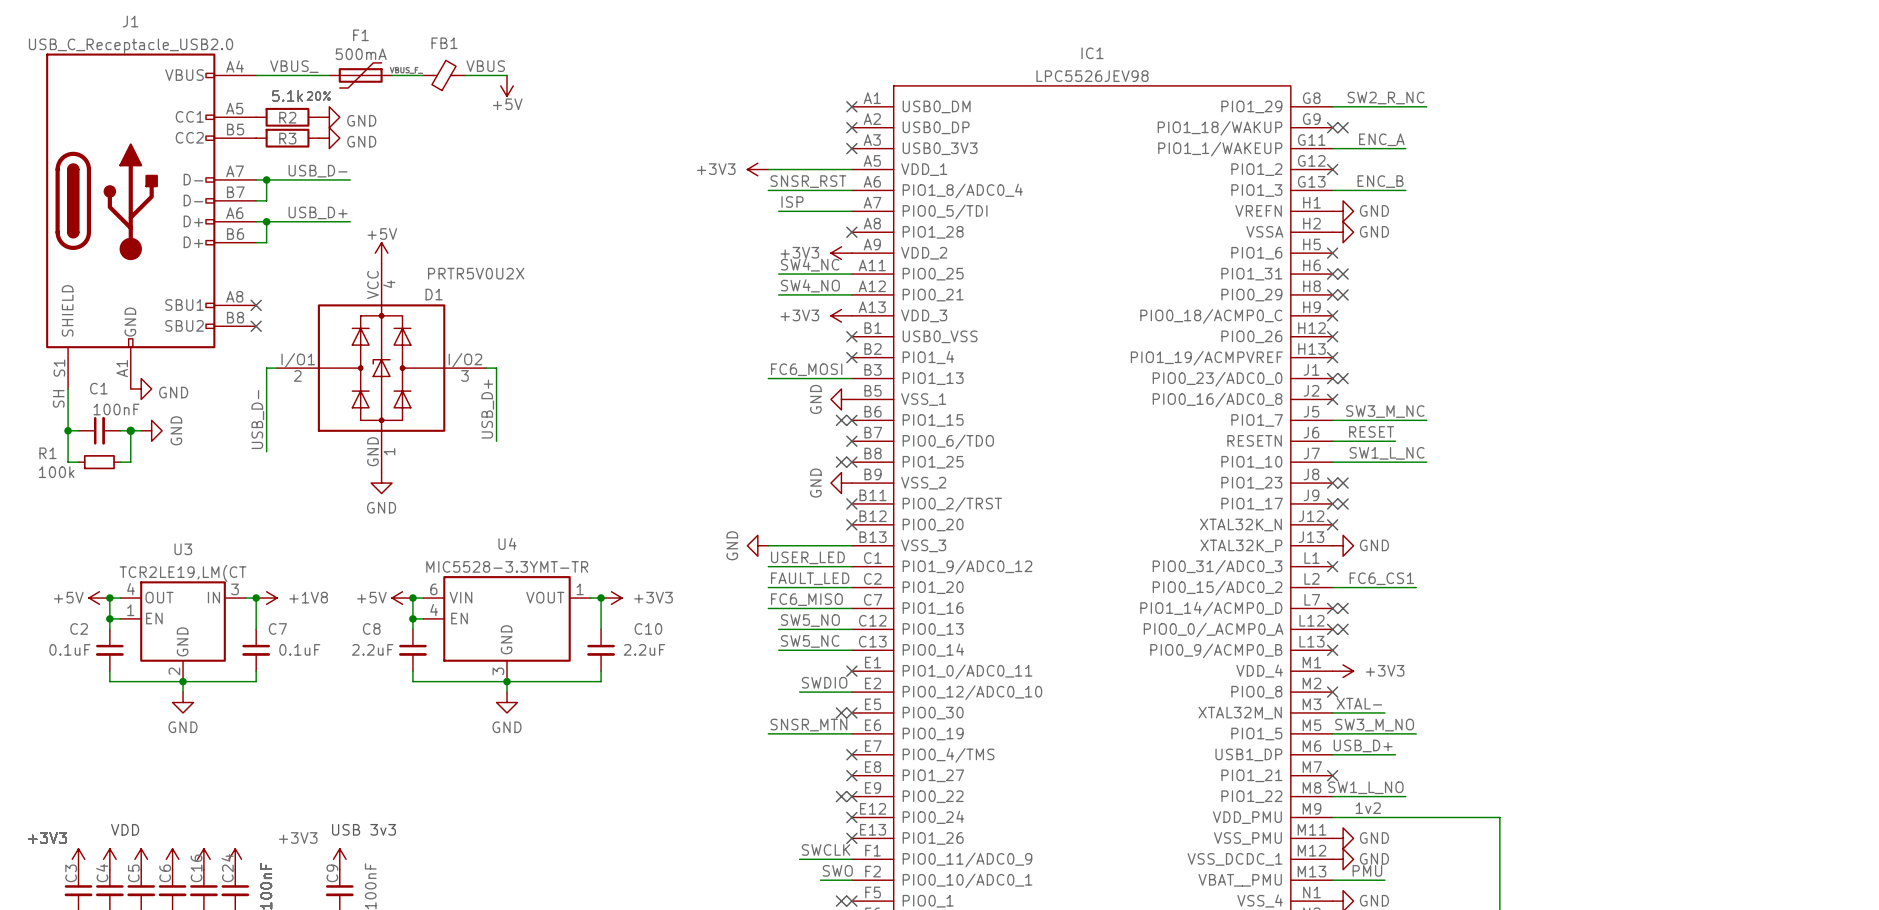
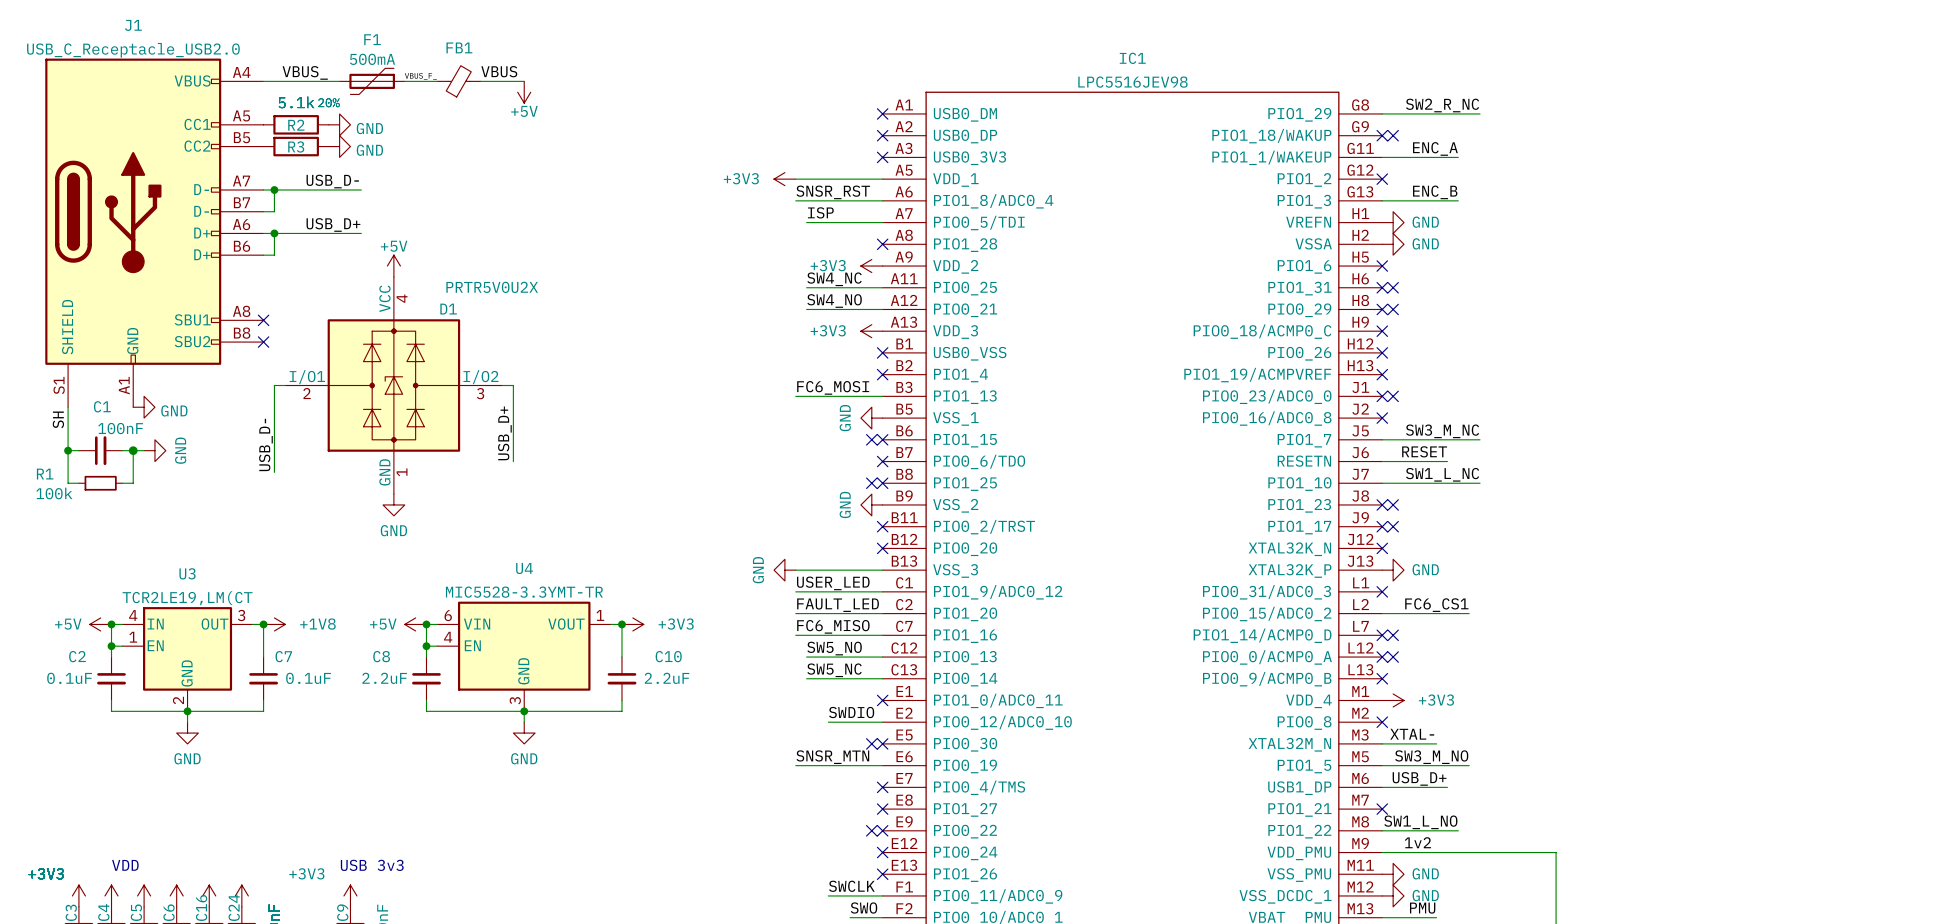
IC1 value: LPC5526JEV98 (1092, 76) -> LPC5516JEV98 (1132, 82)
U3 pin name: OUT (159, 597) -> IN (155, 624)
U3 pin name: IN (213, 597) -> OUT (215, 624)
IC1 pin name: PIO0_0/_ACMP0_A (1213, 629) -> PIO0_0/ACMP0_A (1267, 657)

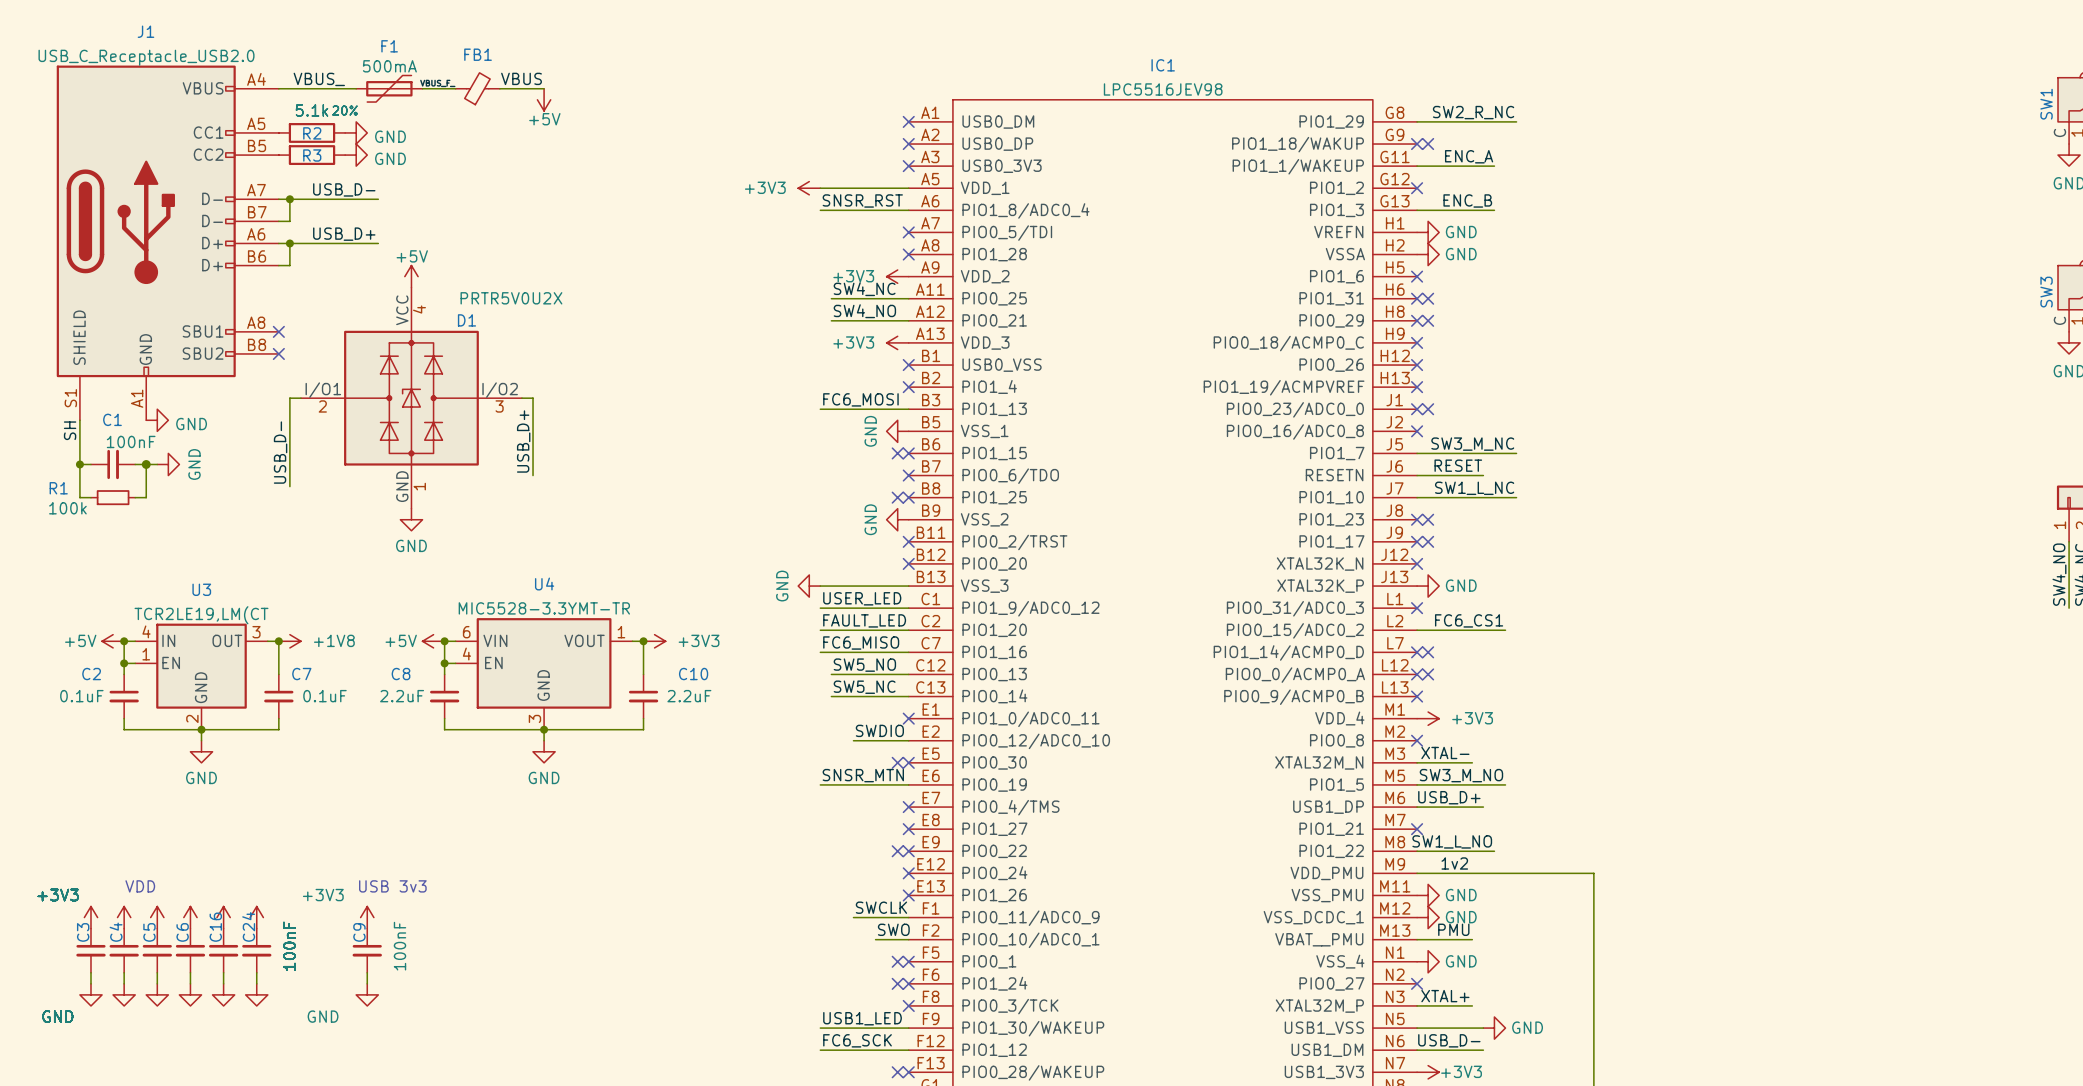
label: ISP (820, 212) -> none
wire: (806, 222) (882, 222) -> none
no-connect mark: none -> (908, 232)

